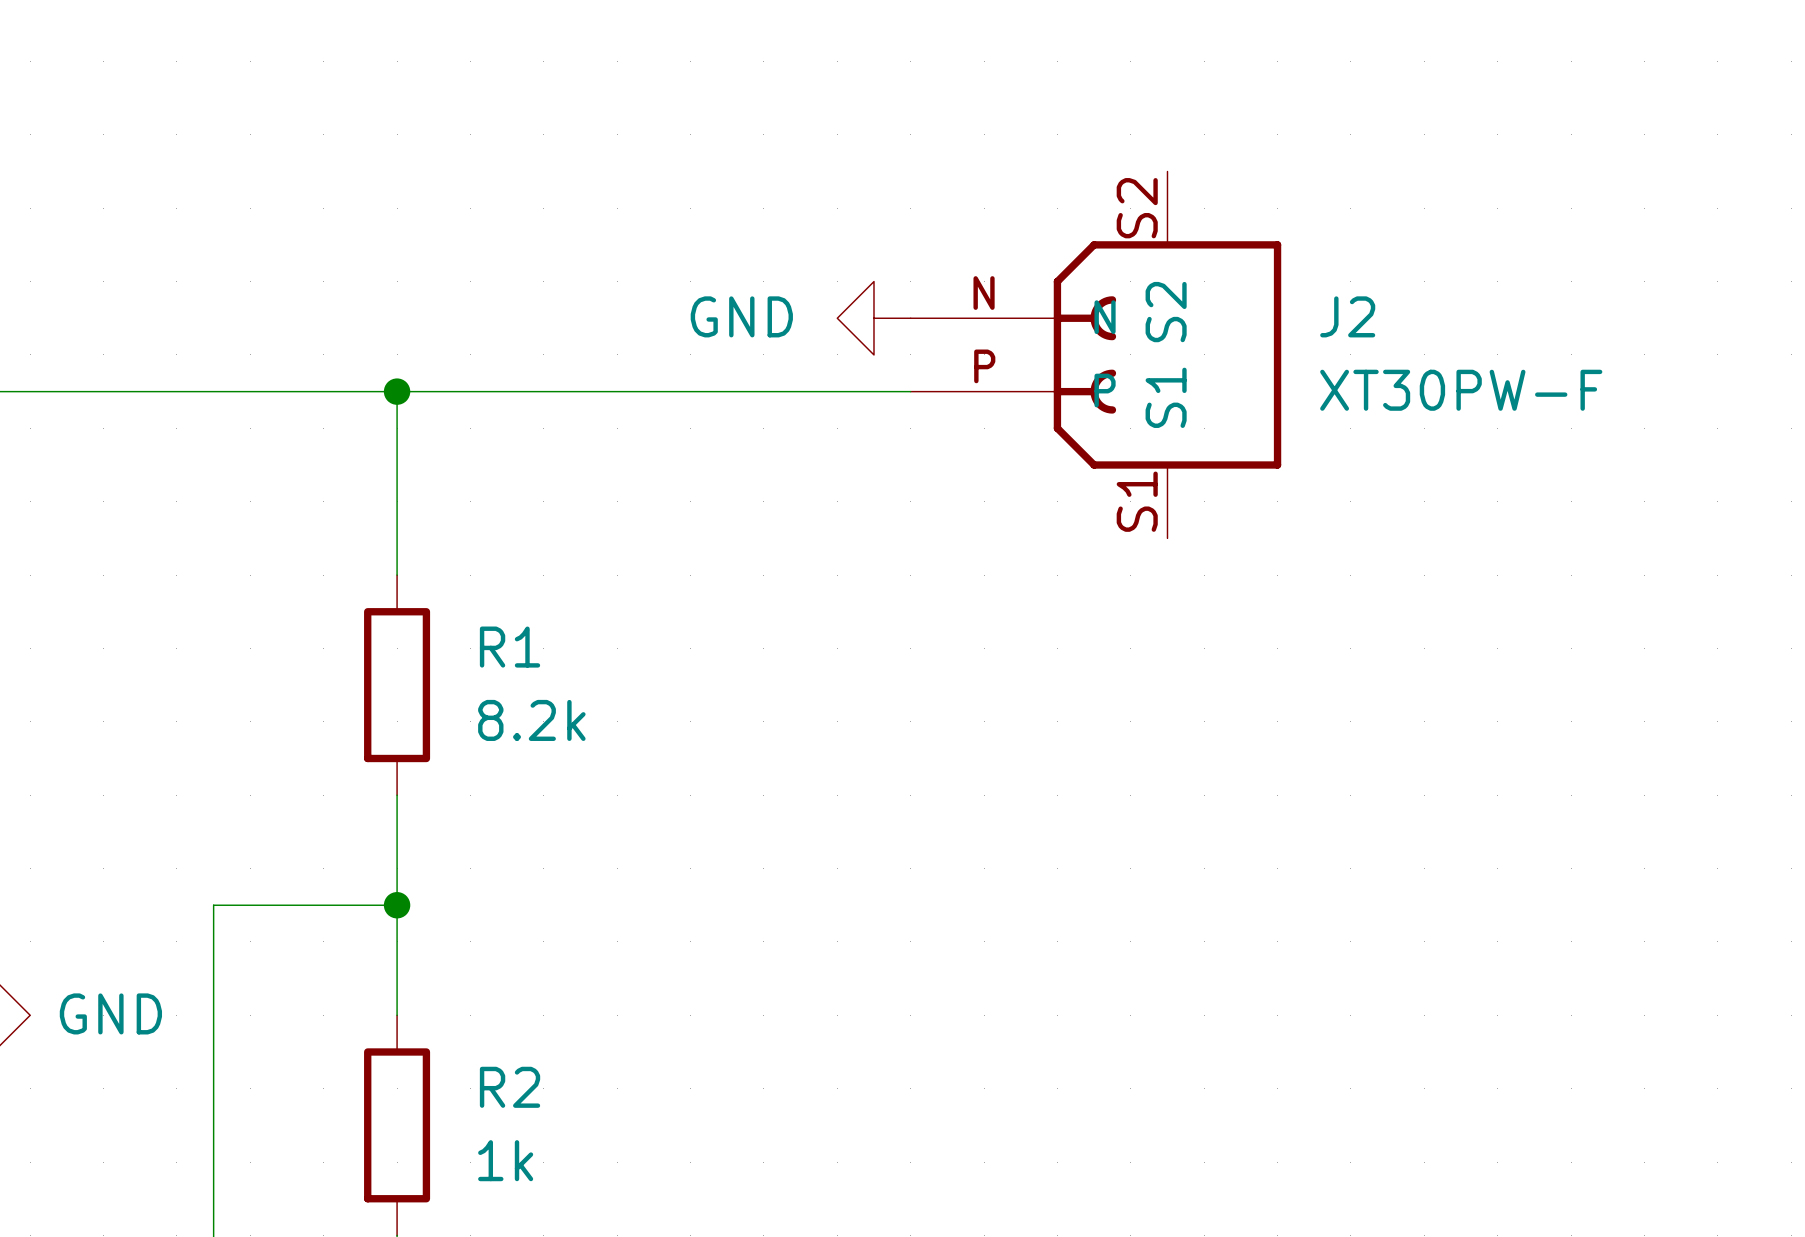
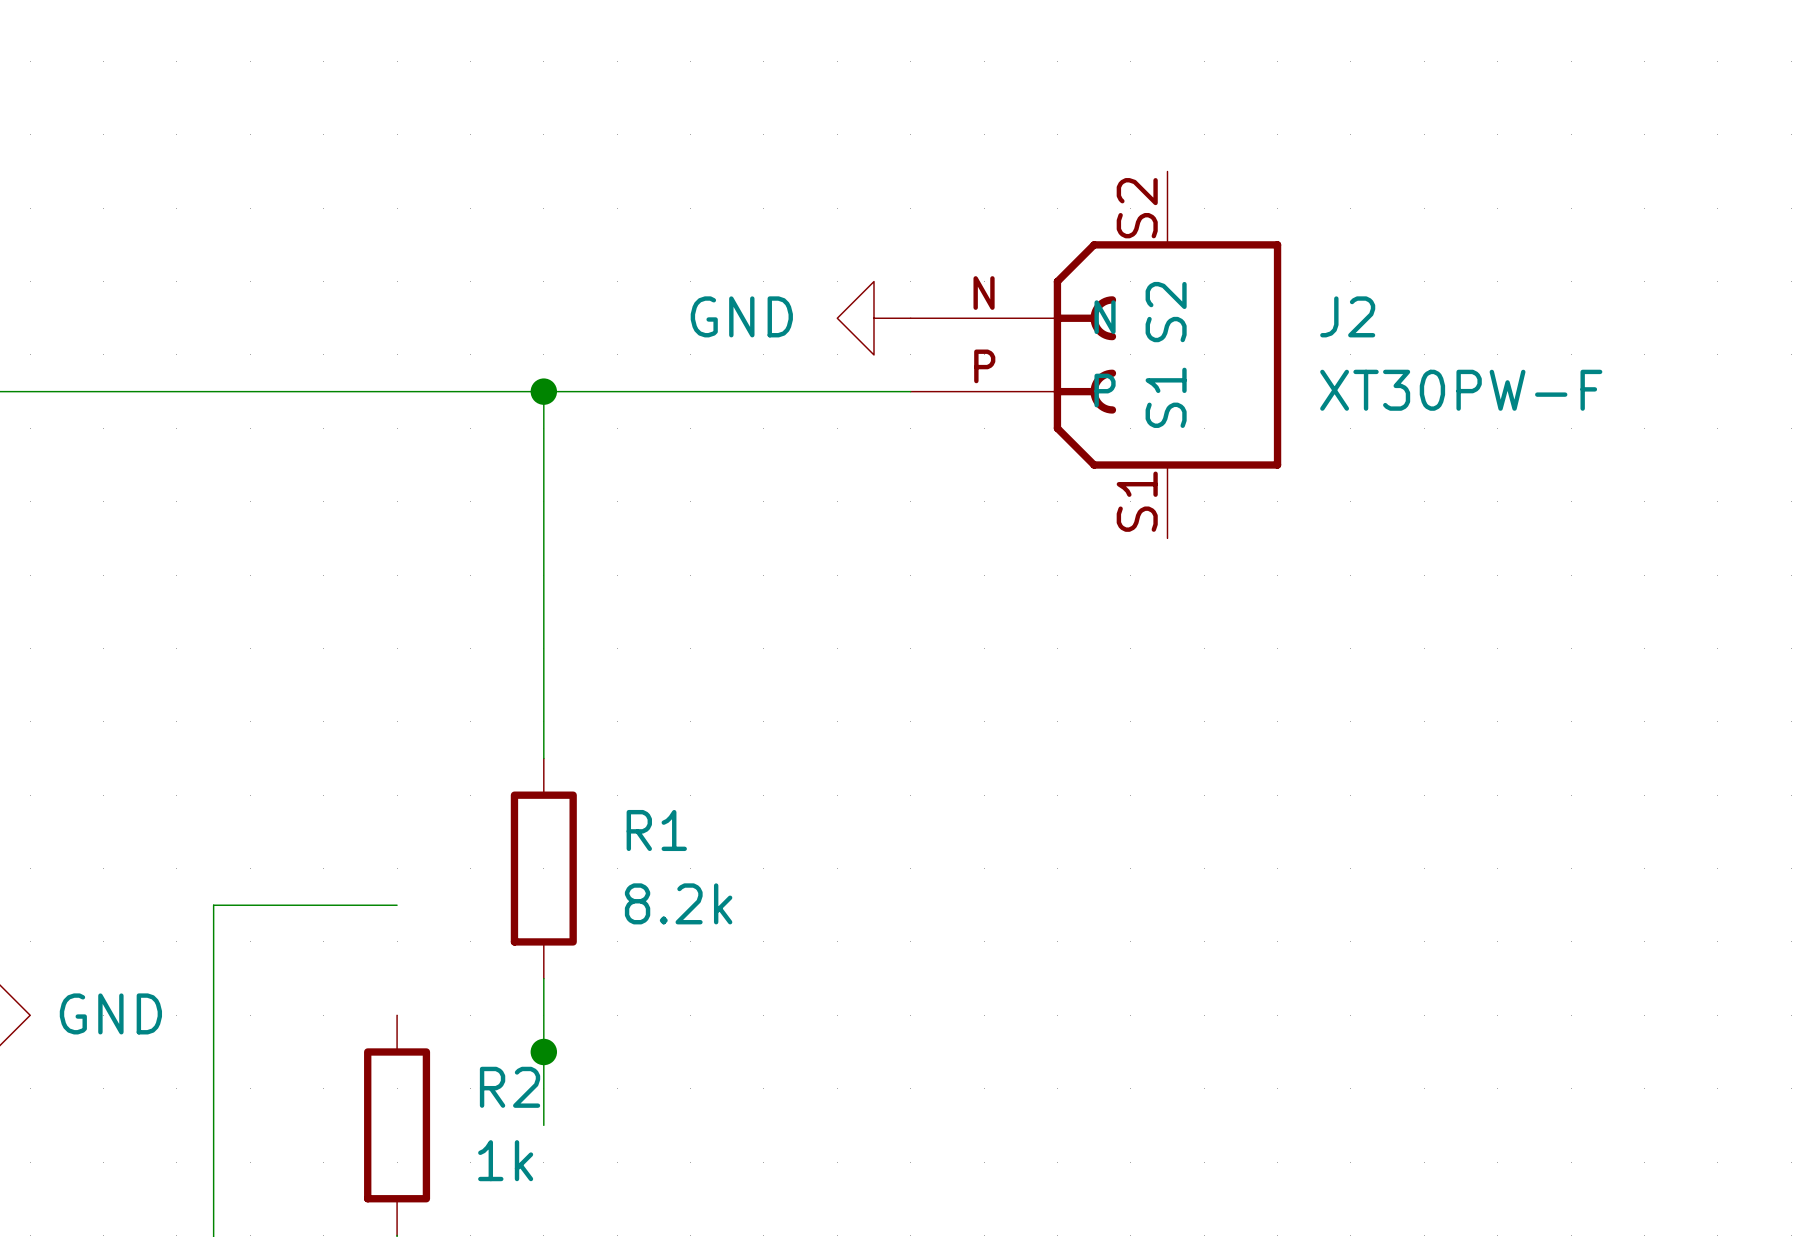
wire: (397, 391) (397, 575) -> none
junction position: (397, 391) -> (543, 391)
wire: none -> (543, 391) (543, 758)
R1 position: (397, 685) -> (543, 868)
wire: (397, 795) (397, 1015) -> none
junction: (397, 905) -> none
wire: none -> (543, 978) (543, 1125)
junction: none -> (543, 1051)

